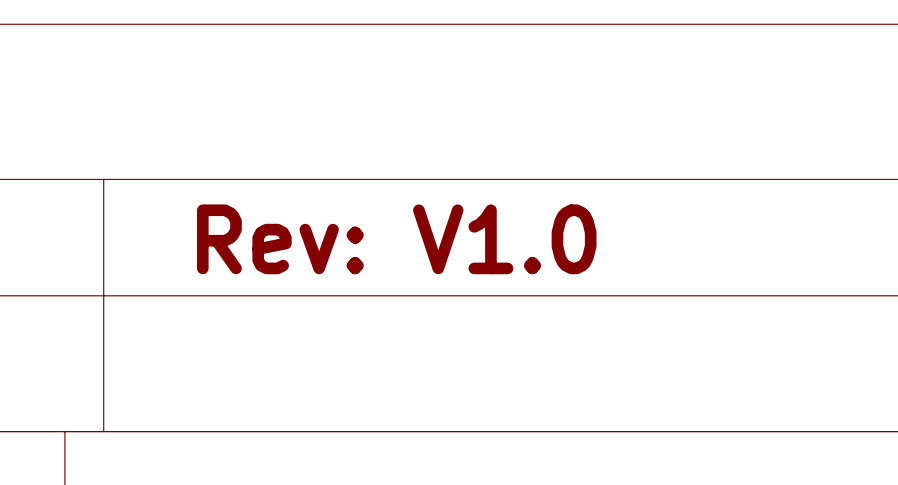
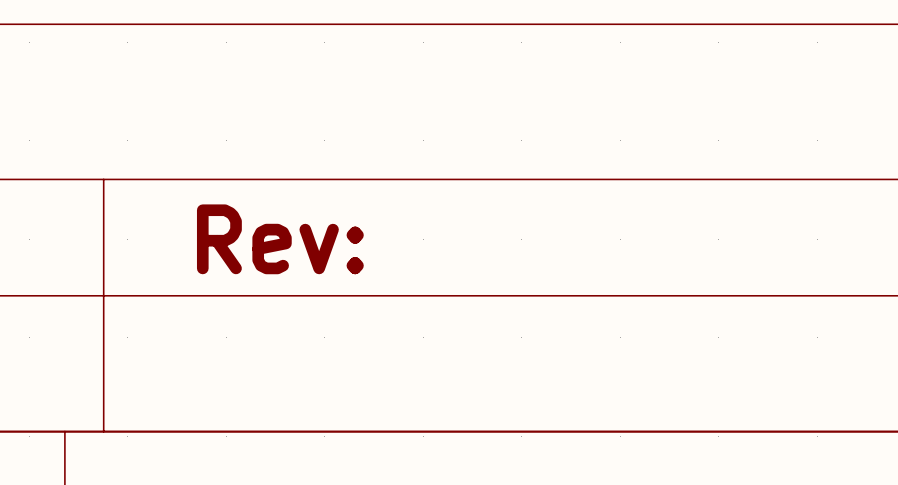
title block: Rev: V1.0 (396, 239) -> Rev: (280, 239)

